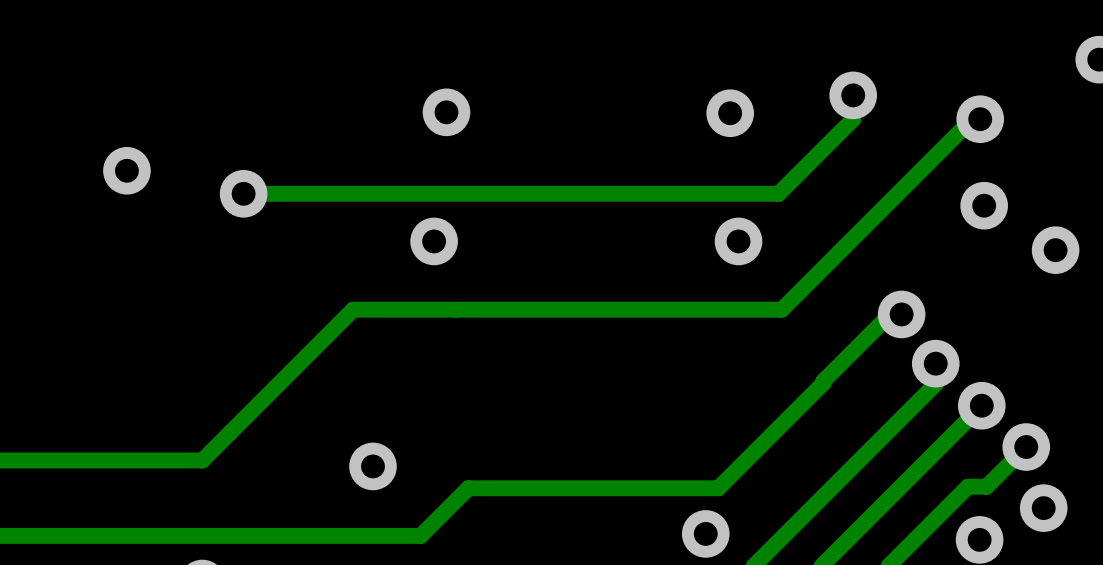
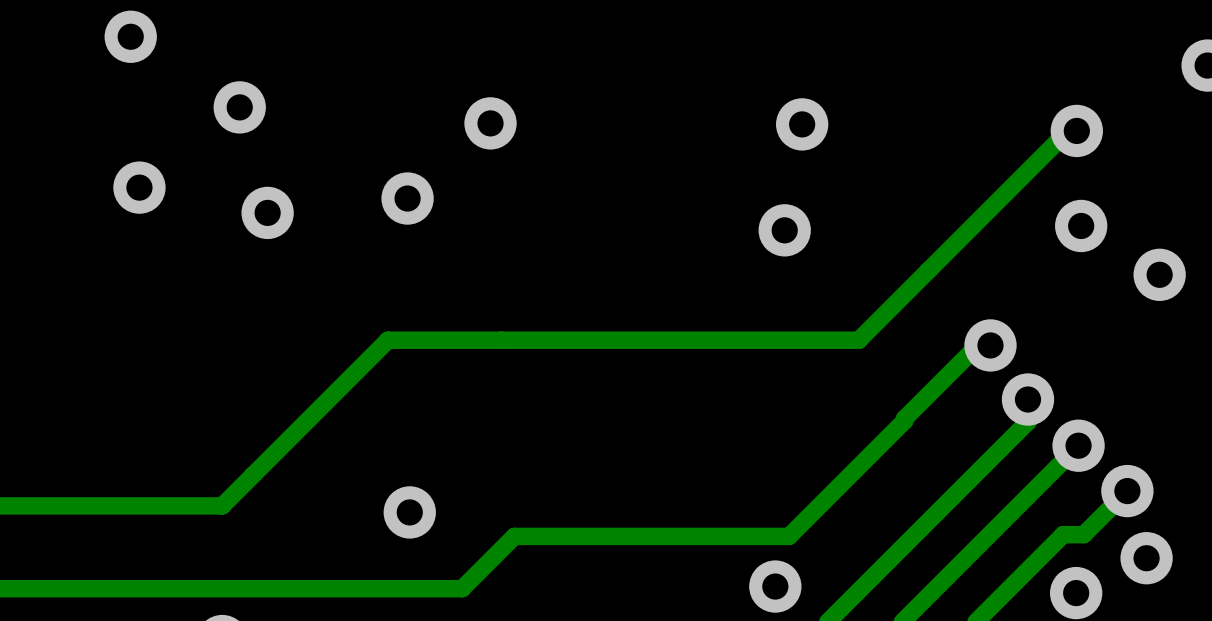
via: none -> (130, 36)
track: (853, 95) (853, 119) (778, 193) (243, 193) -> none
via: (853, 95) -> none
via: none -> (239, 107)
via position: (434, 241) -> (407, 198)
via position: (738, 241) -> (784, 230)

